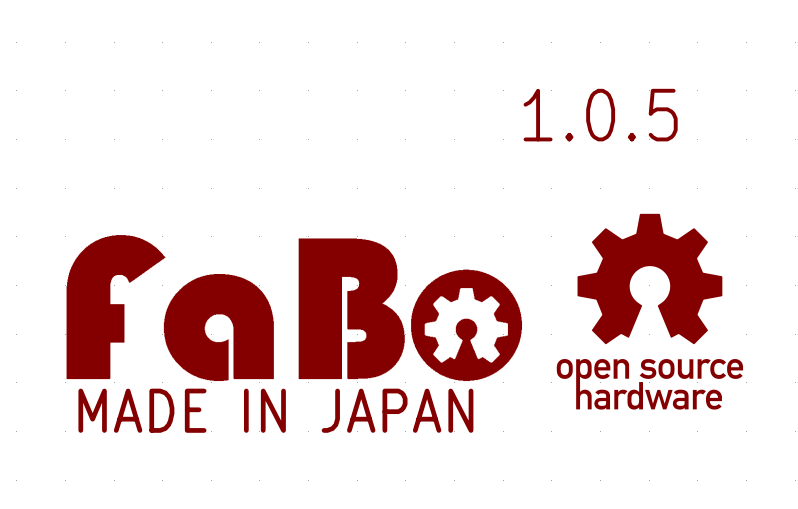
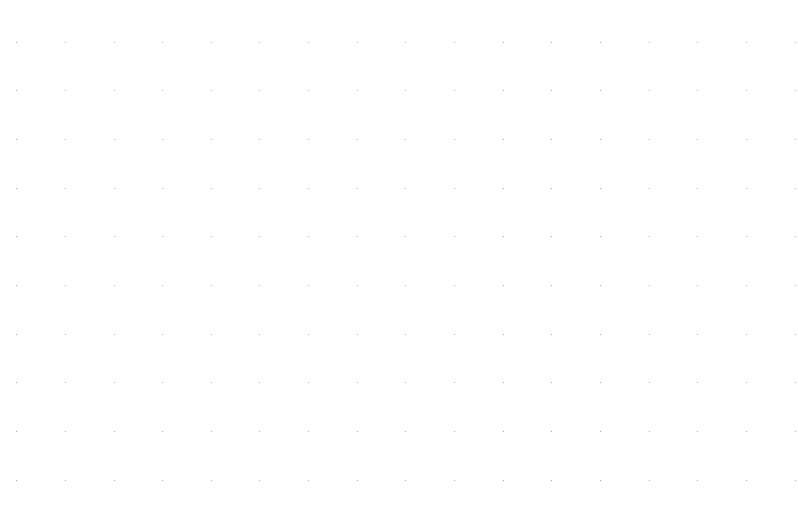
text: 1.0.5 (600, 115) -> none
part: (294, 308) -> none
part: (649, 311) -> none

